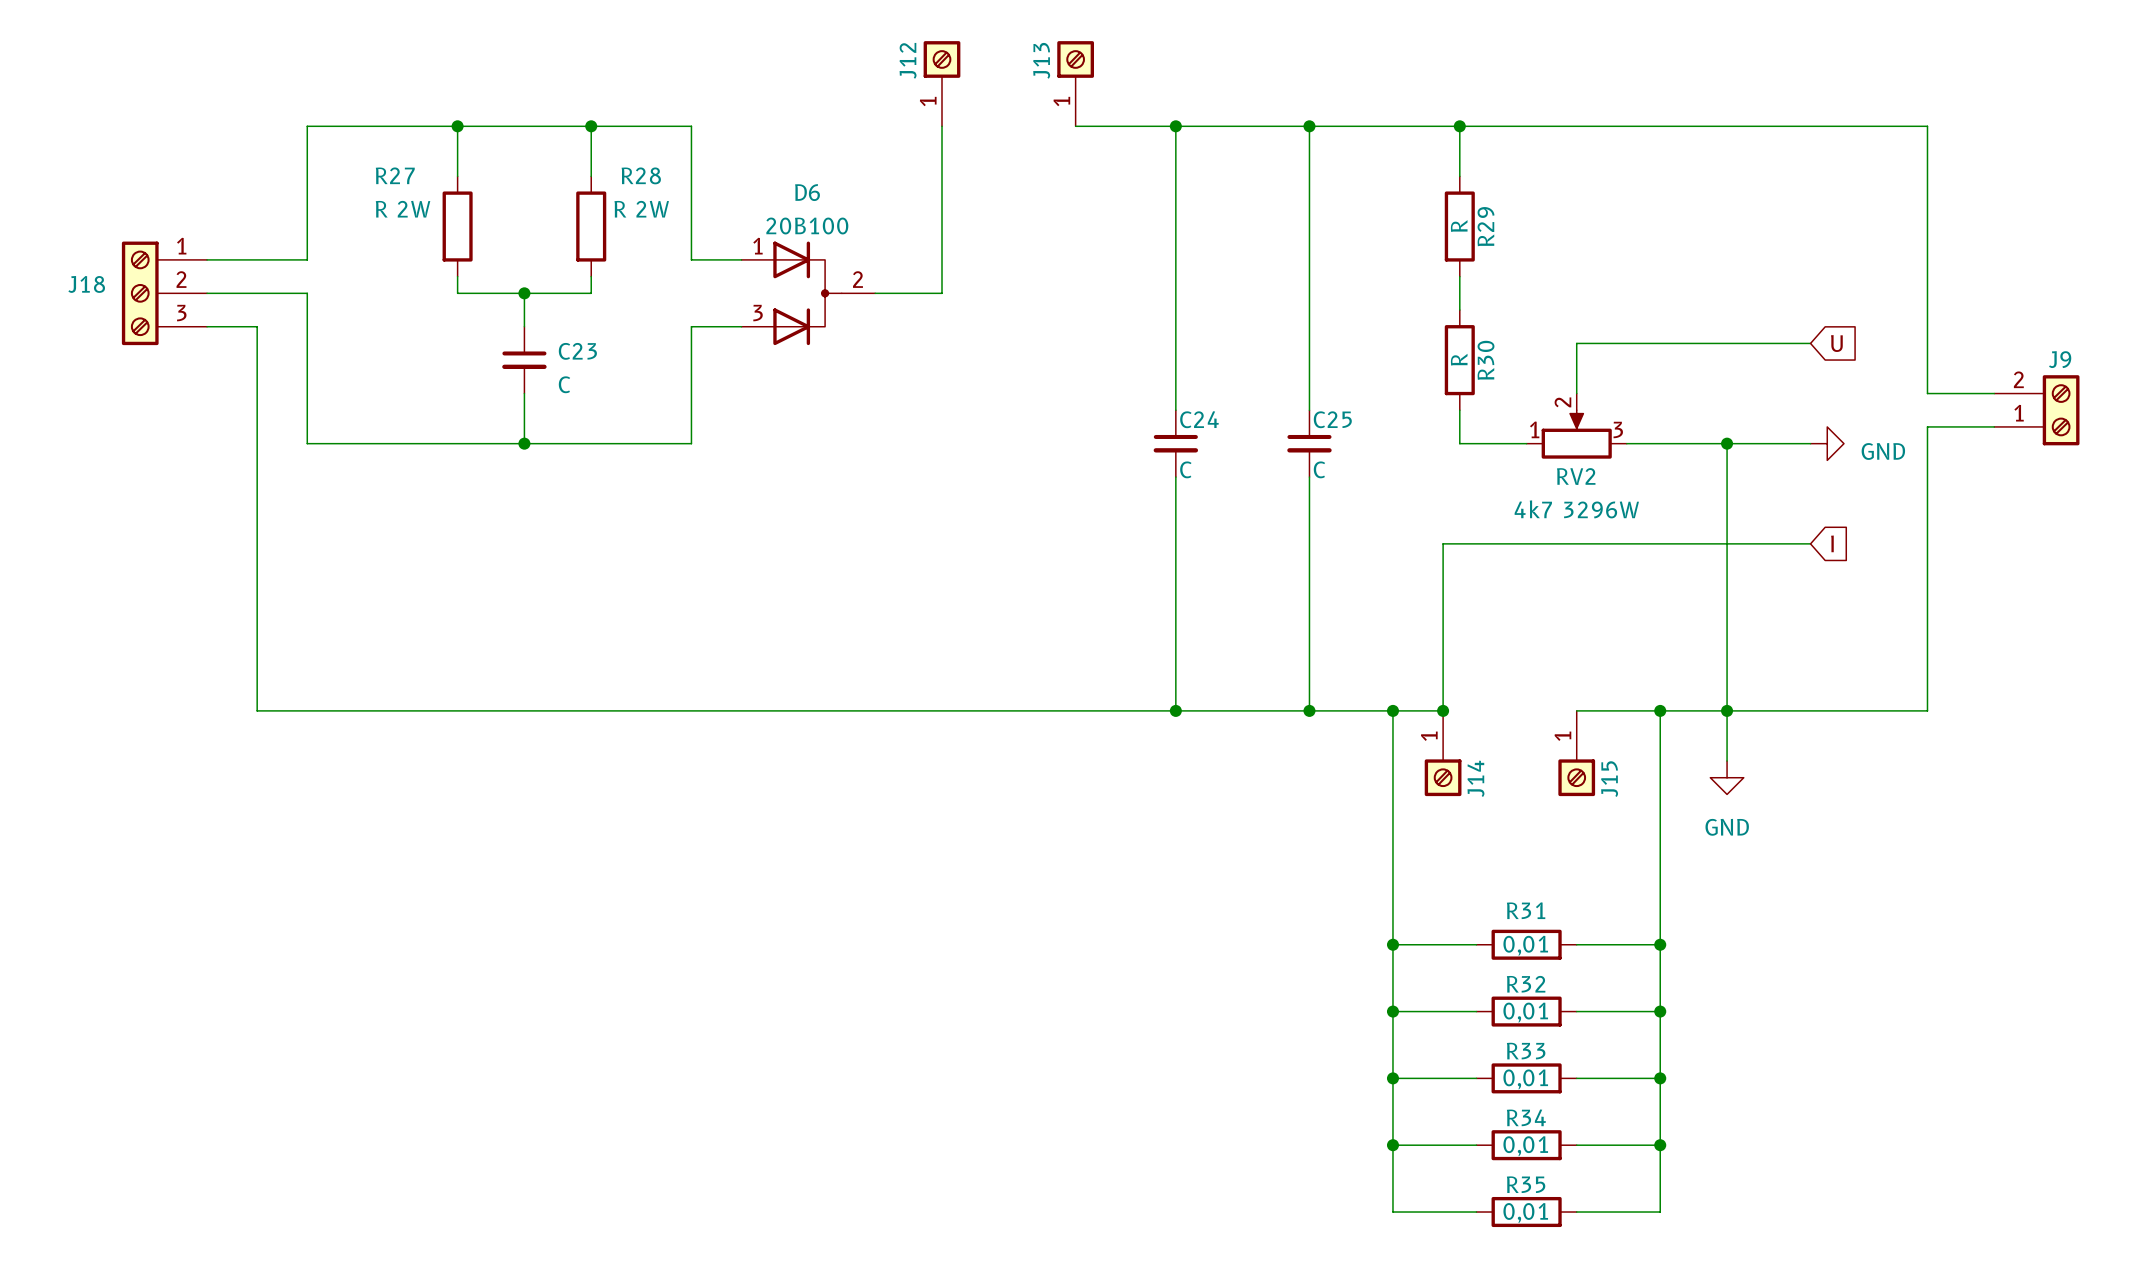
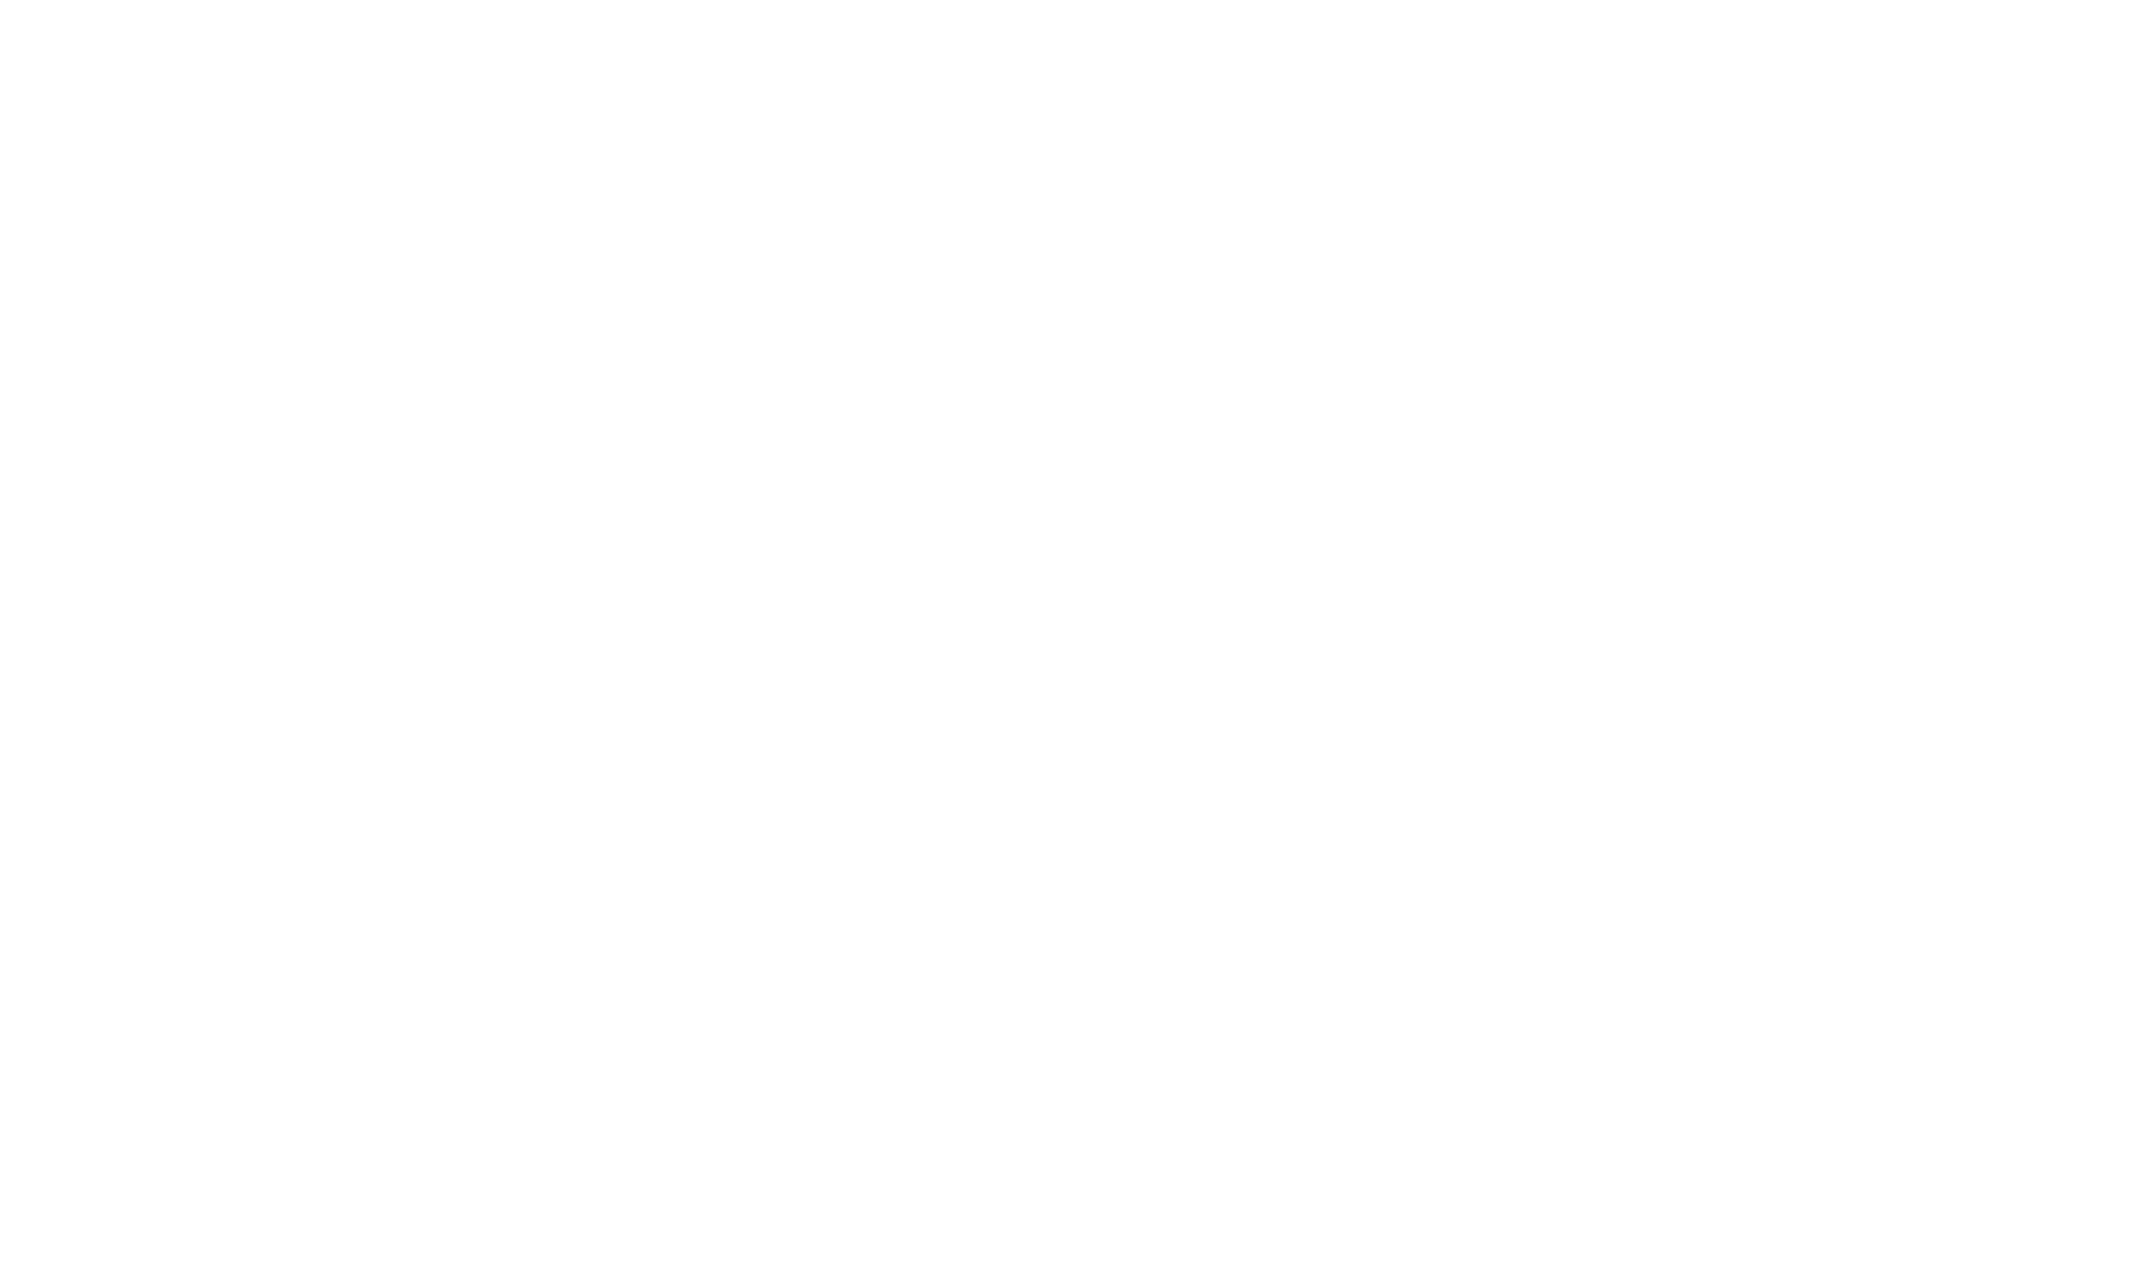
J12: (942, 83) -> none
J13: (1075, 83) -> none
wire: (457, 126) (457, 176) -> none
junction: (457, 126) -> none
wire: (591, 126) (591, 176) -> none
junction: (591, 126) -> none
wire: (942, 126) (942, 293) (875, 293) -> none
wire: (1075, 126) (1927, 126) (1927, 393) (1994, 393) -> none
wire: (1175, 126) (1175, 410) -> none
junction: (1175, 126) -> none
wire: (1309, 126) (1309, 410) -> none
junction: (1309, 126) -> none
wire: (1459, 126) (1459, 176) -> none
junction: (1459, 126) -> none
R27: R 2W (457, 226) -> none
R28: R 2W (591, 226) -> none
R29: R (1459, 226) -> none
wire: (207, 259) (307, 259) (307, 126) (691, 126) (691, 259) (741, 259) -> none
wire: (457, 276) (457, 293) (591, 293) (591, 276) -> none
wire: (1459, 276) (1459, 310) -> none
J18: (164, 293) -> none
wire: (207, 293) (307, 293) (307, 443) (691, 443) (691, 326) (741, 326) -> none
wire: (524, 293) (524, 326) -> none
junction: (524, 293) -> none
D6: 20B100 (808, 293) -> none
wire: (207, 326) (257, 326) (257, 710) (1443, 710) (1443, 543) (1810, 543) -> none
wire: (1810, 343) (1576, 343) (1576, 393) -> none
global label: U (1836, 343) -> none
C23: C (524, 360) -> none
R30: R (1459, 360) -> none
wire: (524, 393) (524, 443) -> none
wire: (1459, 410) (1459, 443) (1526, 443) -> none
J9: (2036, 410) -> none
RV2: 4k7 3296W (1576, 426) -> none
wire: (1994, 426) (1927, 426) (1927, 710) (1576, 710) -> none
junction: (524, 443) -> none
C24: C (1175, 443) -> none
C25: C (1309, 443) -> none
wire: (1626, 443) (1810, 443) -> none
wire: (1727, 443) (1727, 761) -> none
junction: (1727, 443) -> none
power symbol: GND (1827, 443) -> none
wire: (1175, 477) (1175, 710) -> none
wire: (1309, 477) (1309, 710) -> none
global label: I (1832, 543) -> none
junction: (1175, 710) -> none
junction: (1309, 710) -> none
wire: (1392, 710) (1392, 1212) (1476, 1212) -> none
junction: (1392, 710) -> none
junction: (1443, 710) -> none
wire: (1660, 710) (1660, 1212) (1576, 1212) -> none
junction: (1660, 710) -> none
junction: (1727, 710) -> none
J14: (1443, 753) -> none
J15: (1576, 753) -> none
power symbol: GND (1727, 777) -> none
wire: (1392, 944) (1476, 944) -> none
junction: (1392, 944) -> none
R31: 0,01 (1526, 944) -> none
wire: (1576, 944) (1660, 944) -> none
junction: (1660, 944) -> none
wire: (1392, 1011) (1476, 1011) -> none
junction: (1392, 1011) -> none
R32: 0,01 (1526, 1011) -> none
wire: (1576, 1011) (1660, 1011) -> none
junction: (1660, 1011) -> none
wire: (1392, 1078) (1476, 1078) -> none
junction: (1392, 1078) -> none
R33: 0,01 (1526, 1078) -> none
wire: (1576, 1078) (1660, 1078) -> none
junction: (1660, 1078) -> none
wire: (1392, 1145) (1476, 1145) -> none
junction: (1392, 1145) -> none
R34: 0,01 (1526, 1145) -> none
wire: (1576, 1145) (1660, 1145) -> none
junction: (1660, 1145) -> none
R35: 0,01 (1526, 1212) -> none

